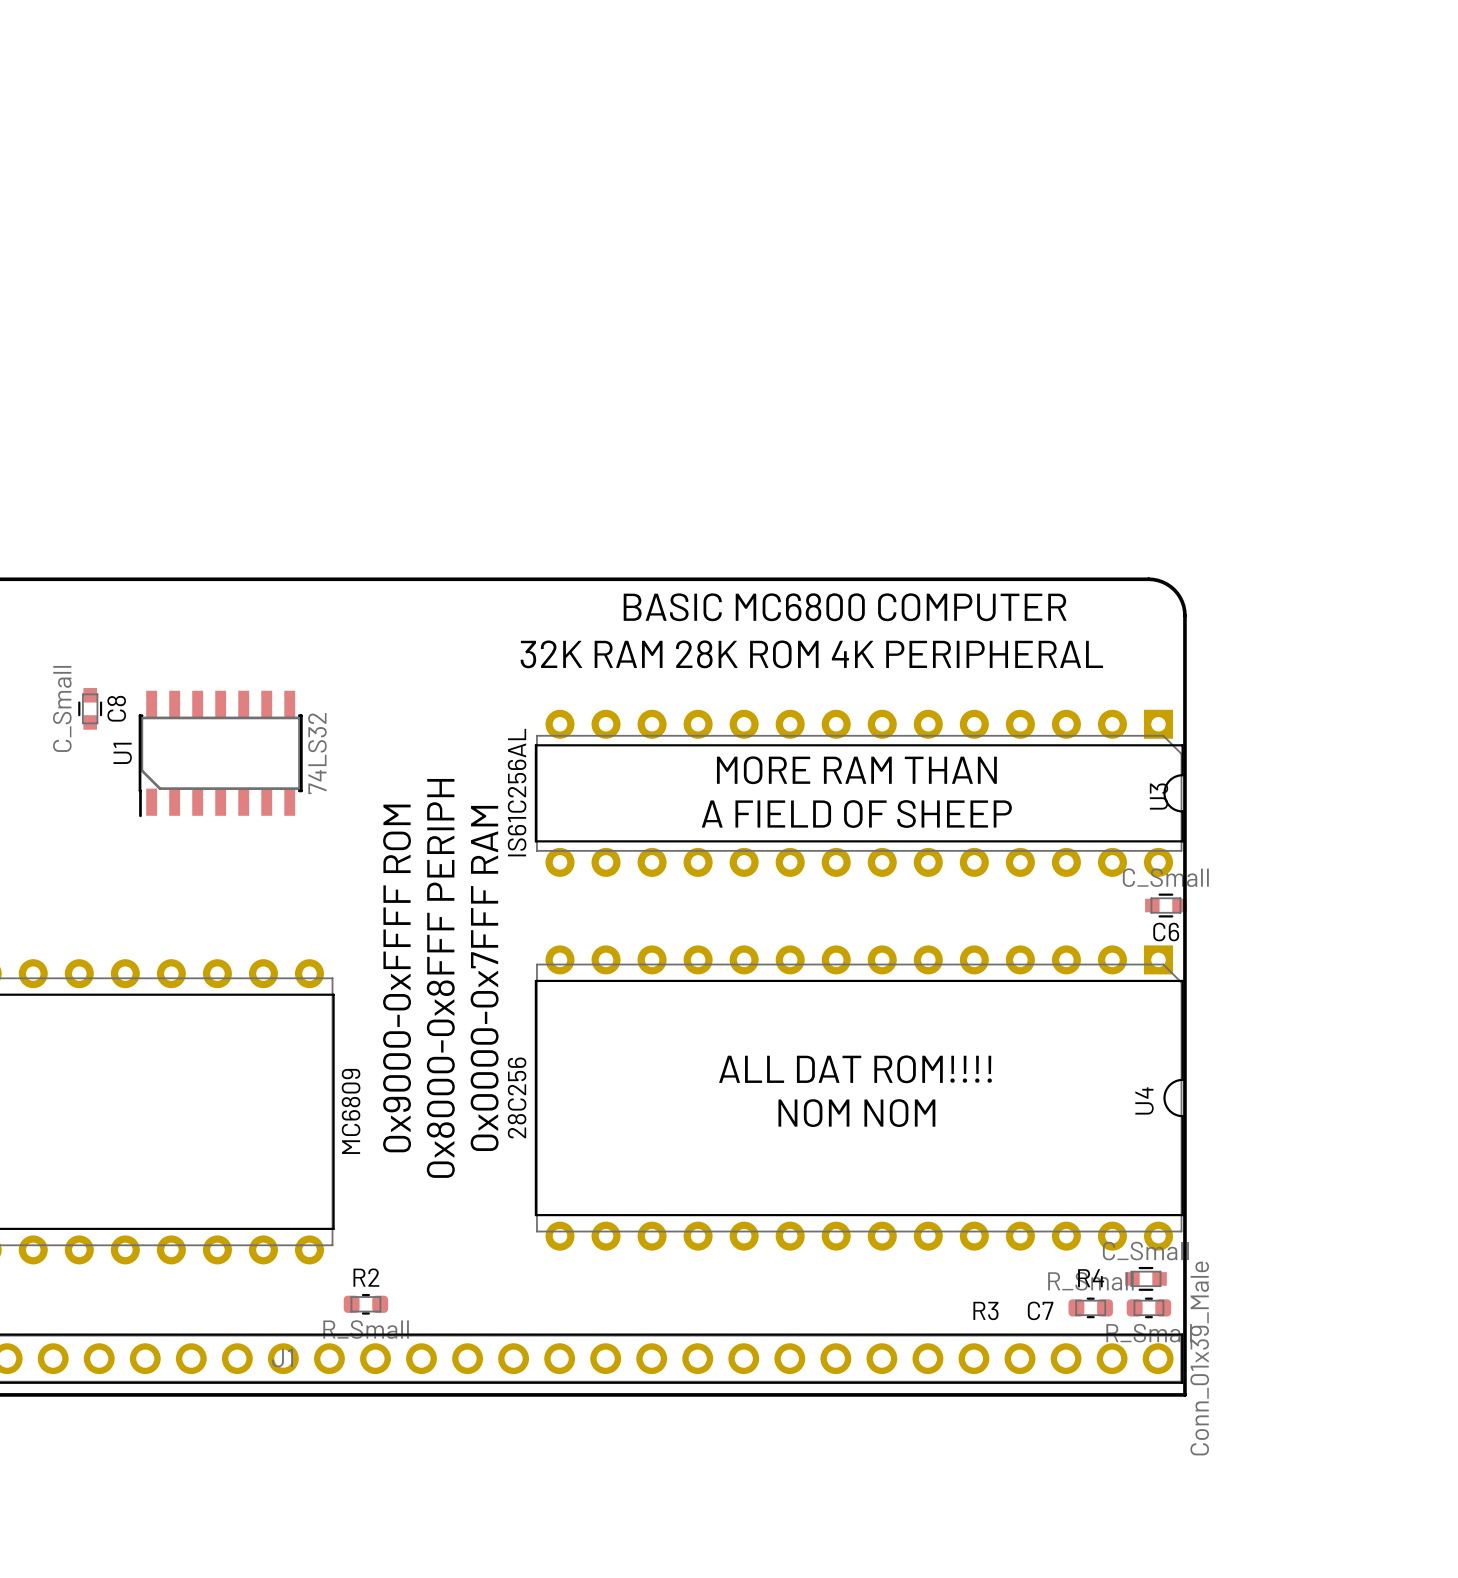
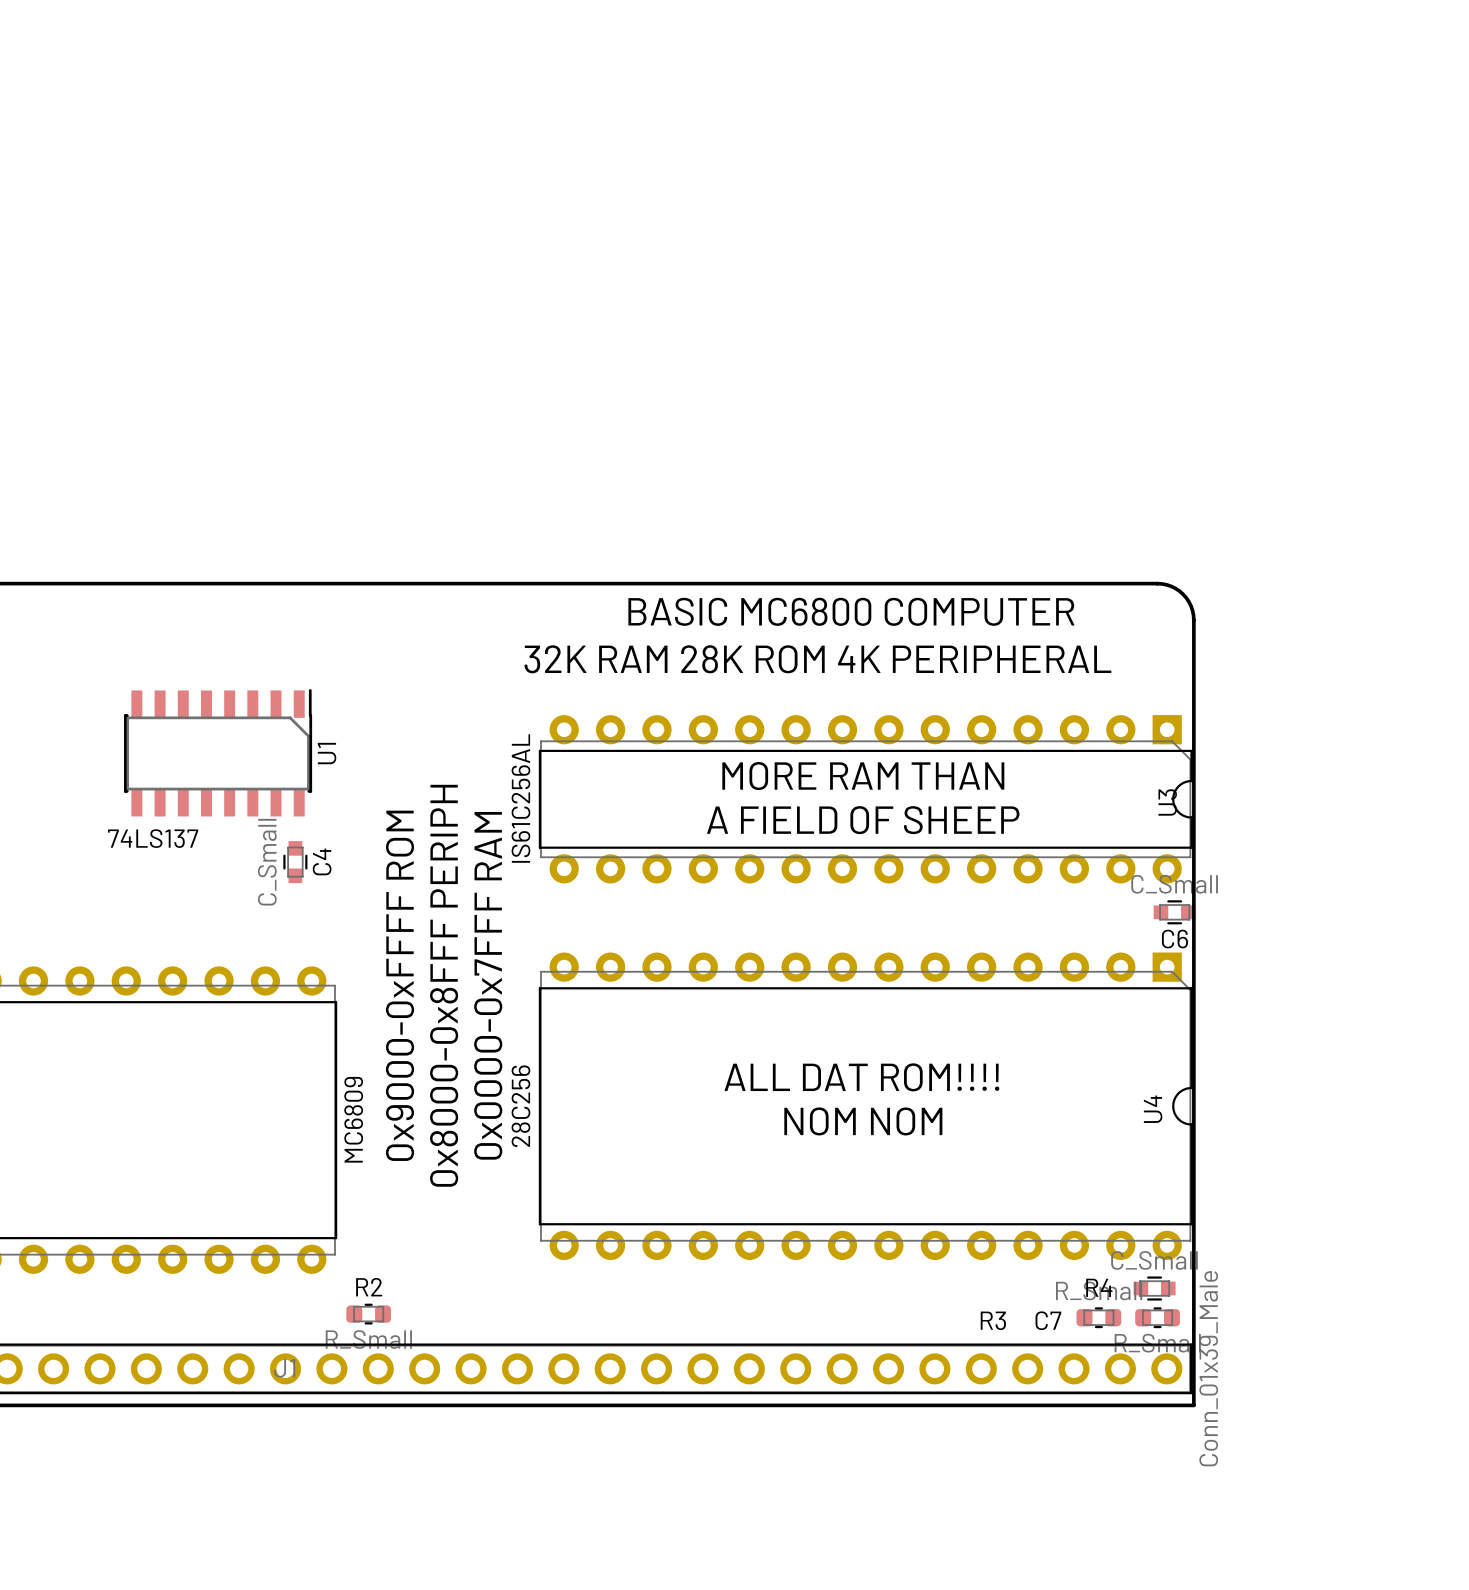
U1 footprint: [138, 690, 303, 818] -> [124, 689, 313, 817]
C8: C_Small (90, 708) -> none
U1 name position: U1 (122, 753) -> U1 (327, 753)
U1 value: 74LS32 (317, 753) -> 74LS137 (153, 838)
C4: none -> C_Small (295, 862)

